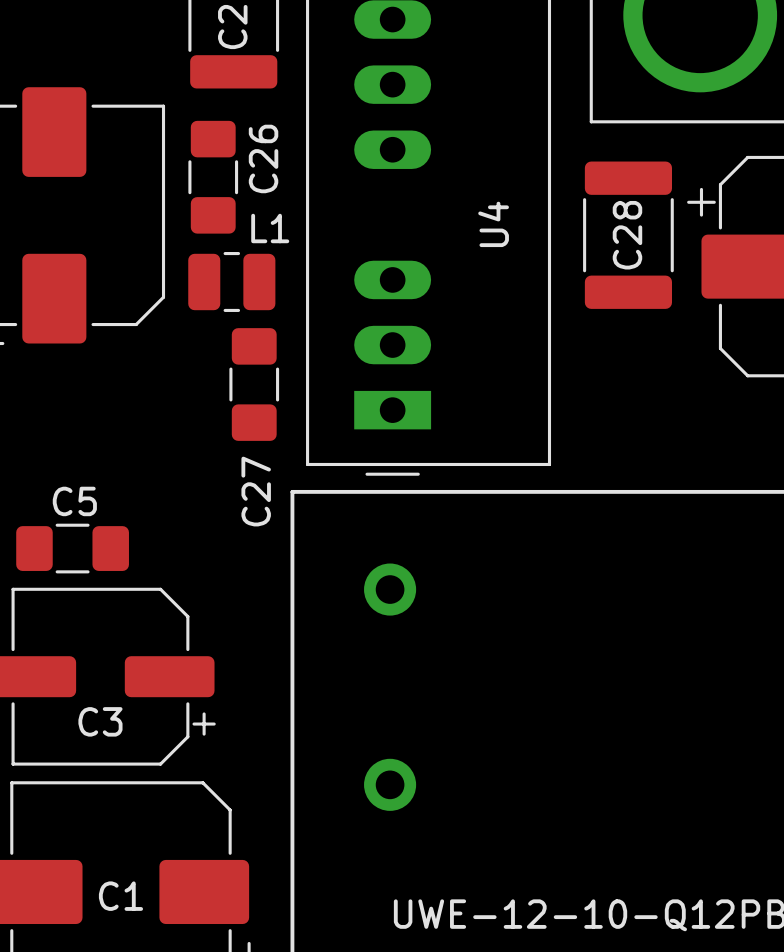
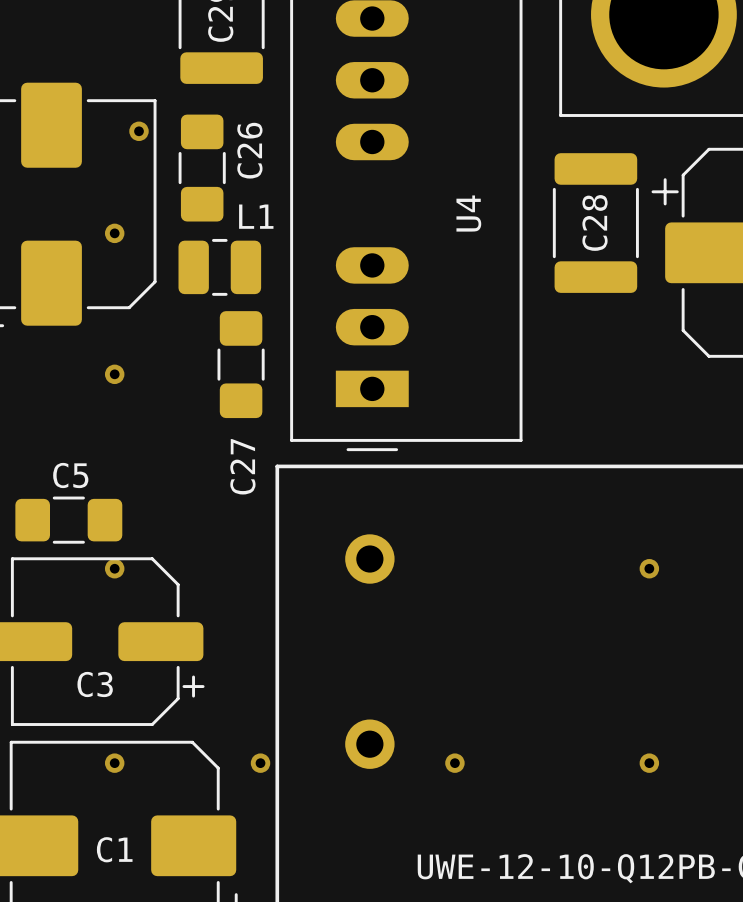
via: none -> (139, 131)
via: none -> (114, 233)
via: none -> (114, 374)
via: none -> (114, 568)
via: none -> (649, 568)
via: none -> (114, 763)
via: none -> (260, 763)
via: none -> (454, 763)
via: none -> (649, 763)

